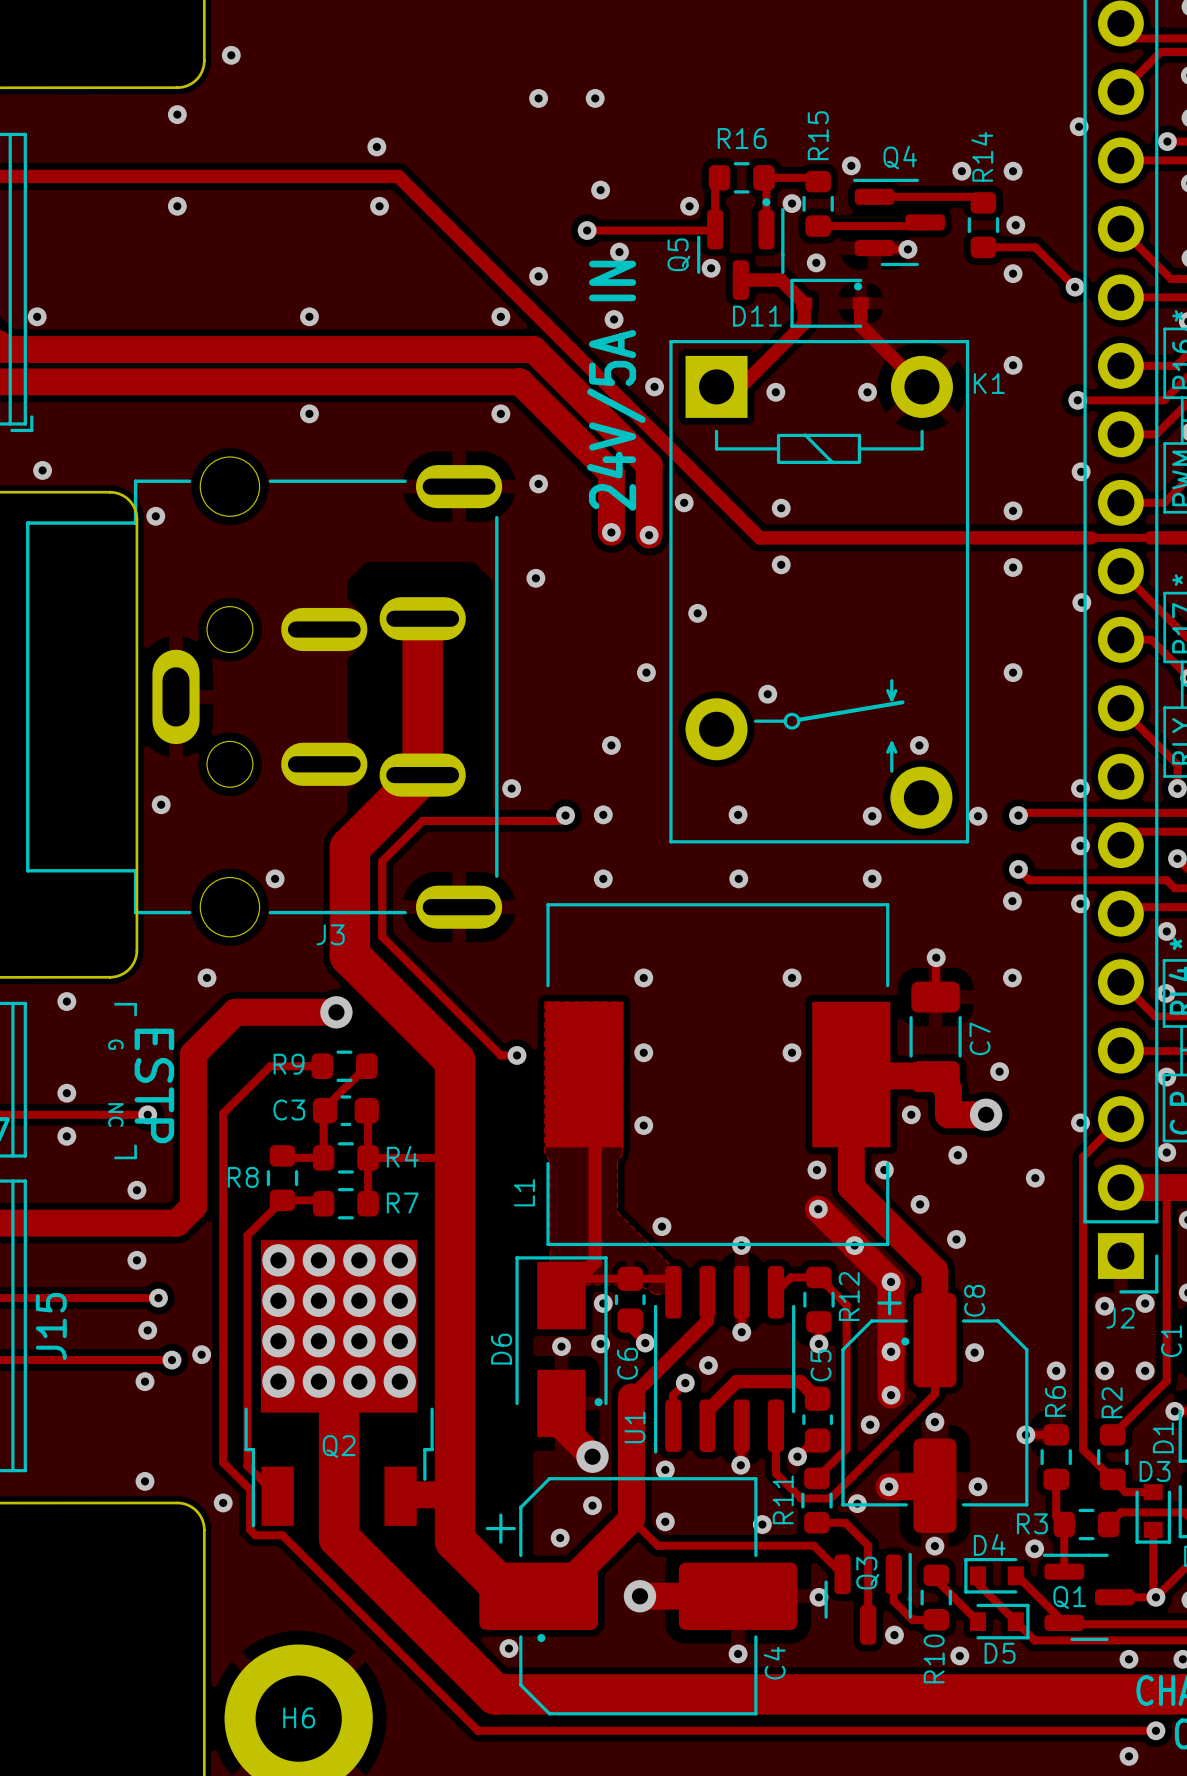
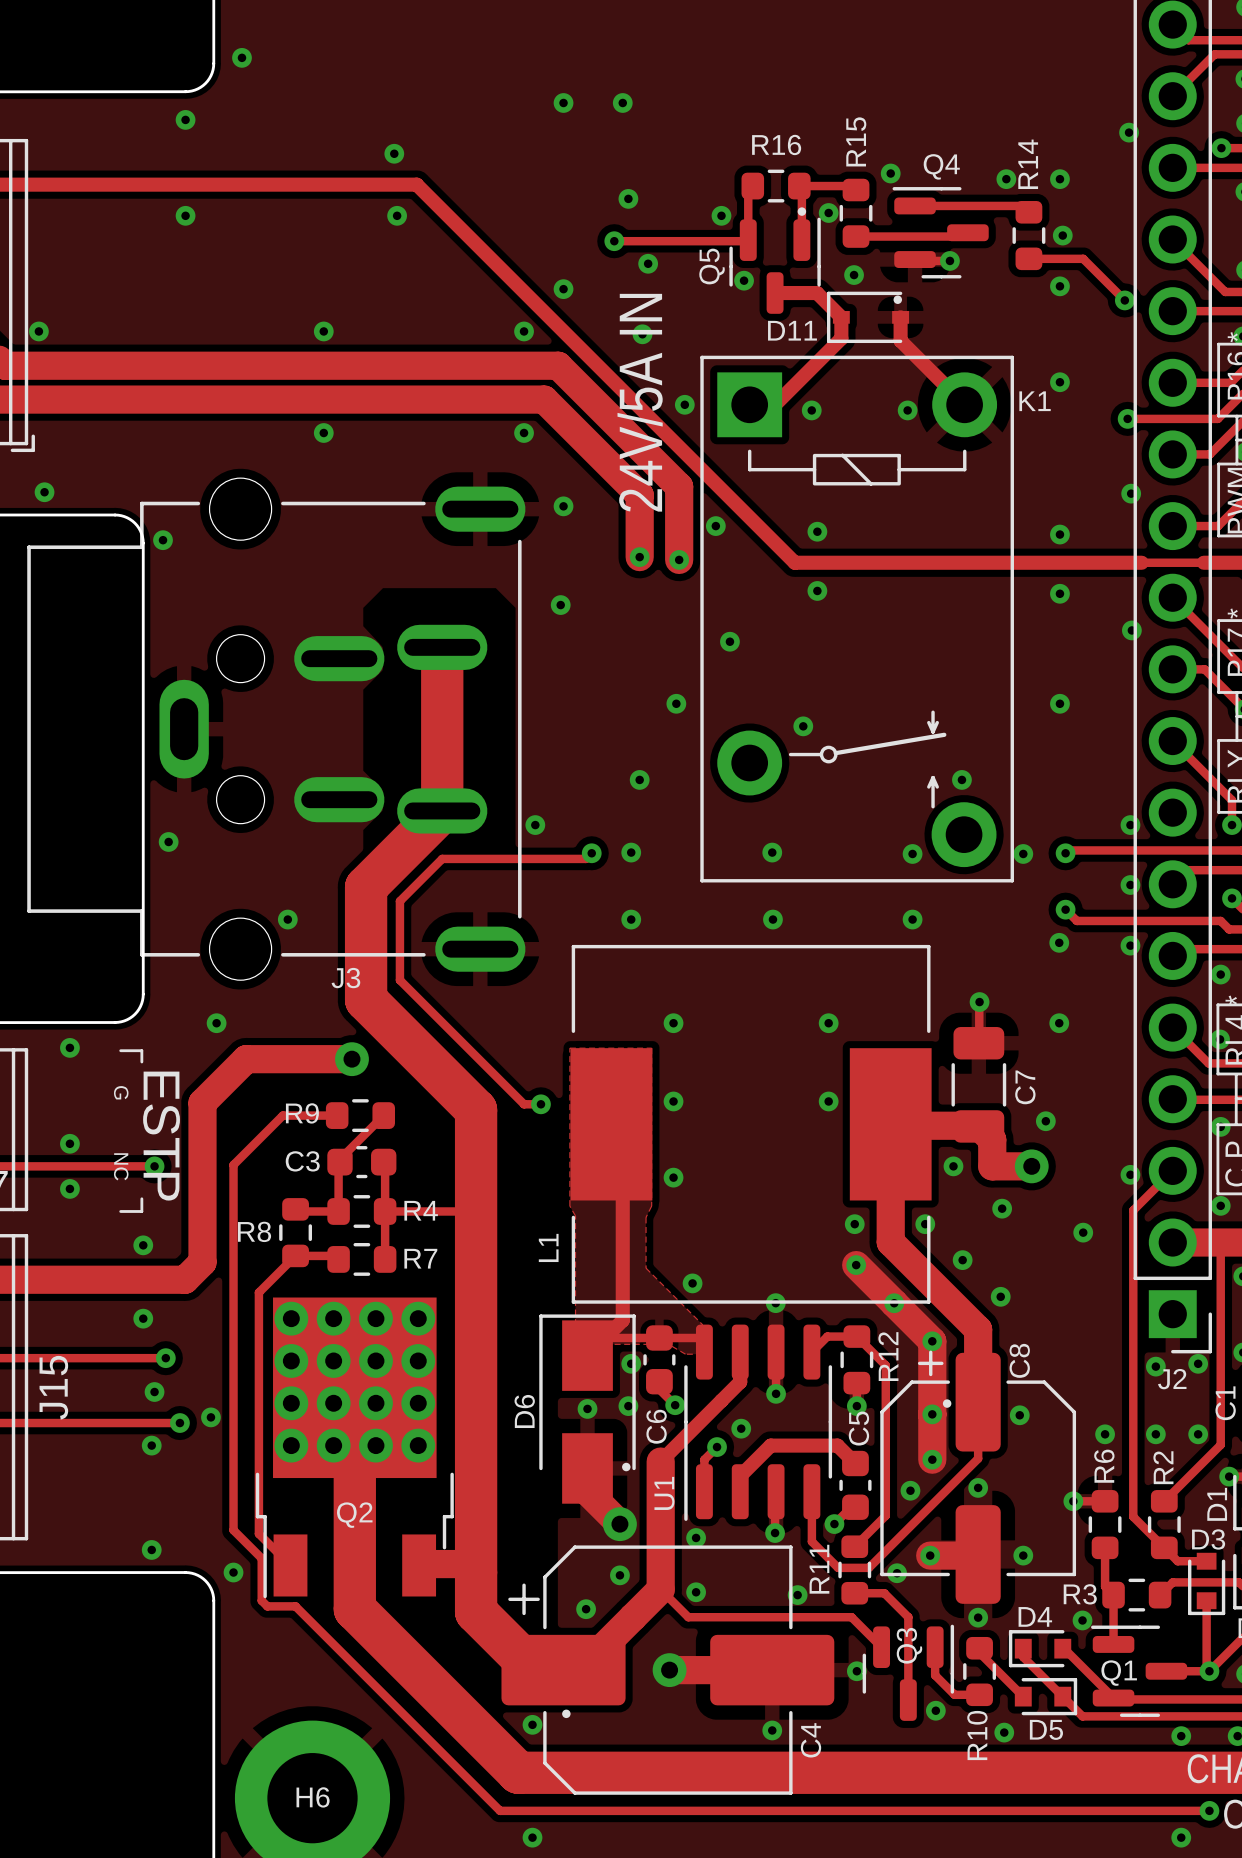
via: none -> (532, 1837)

